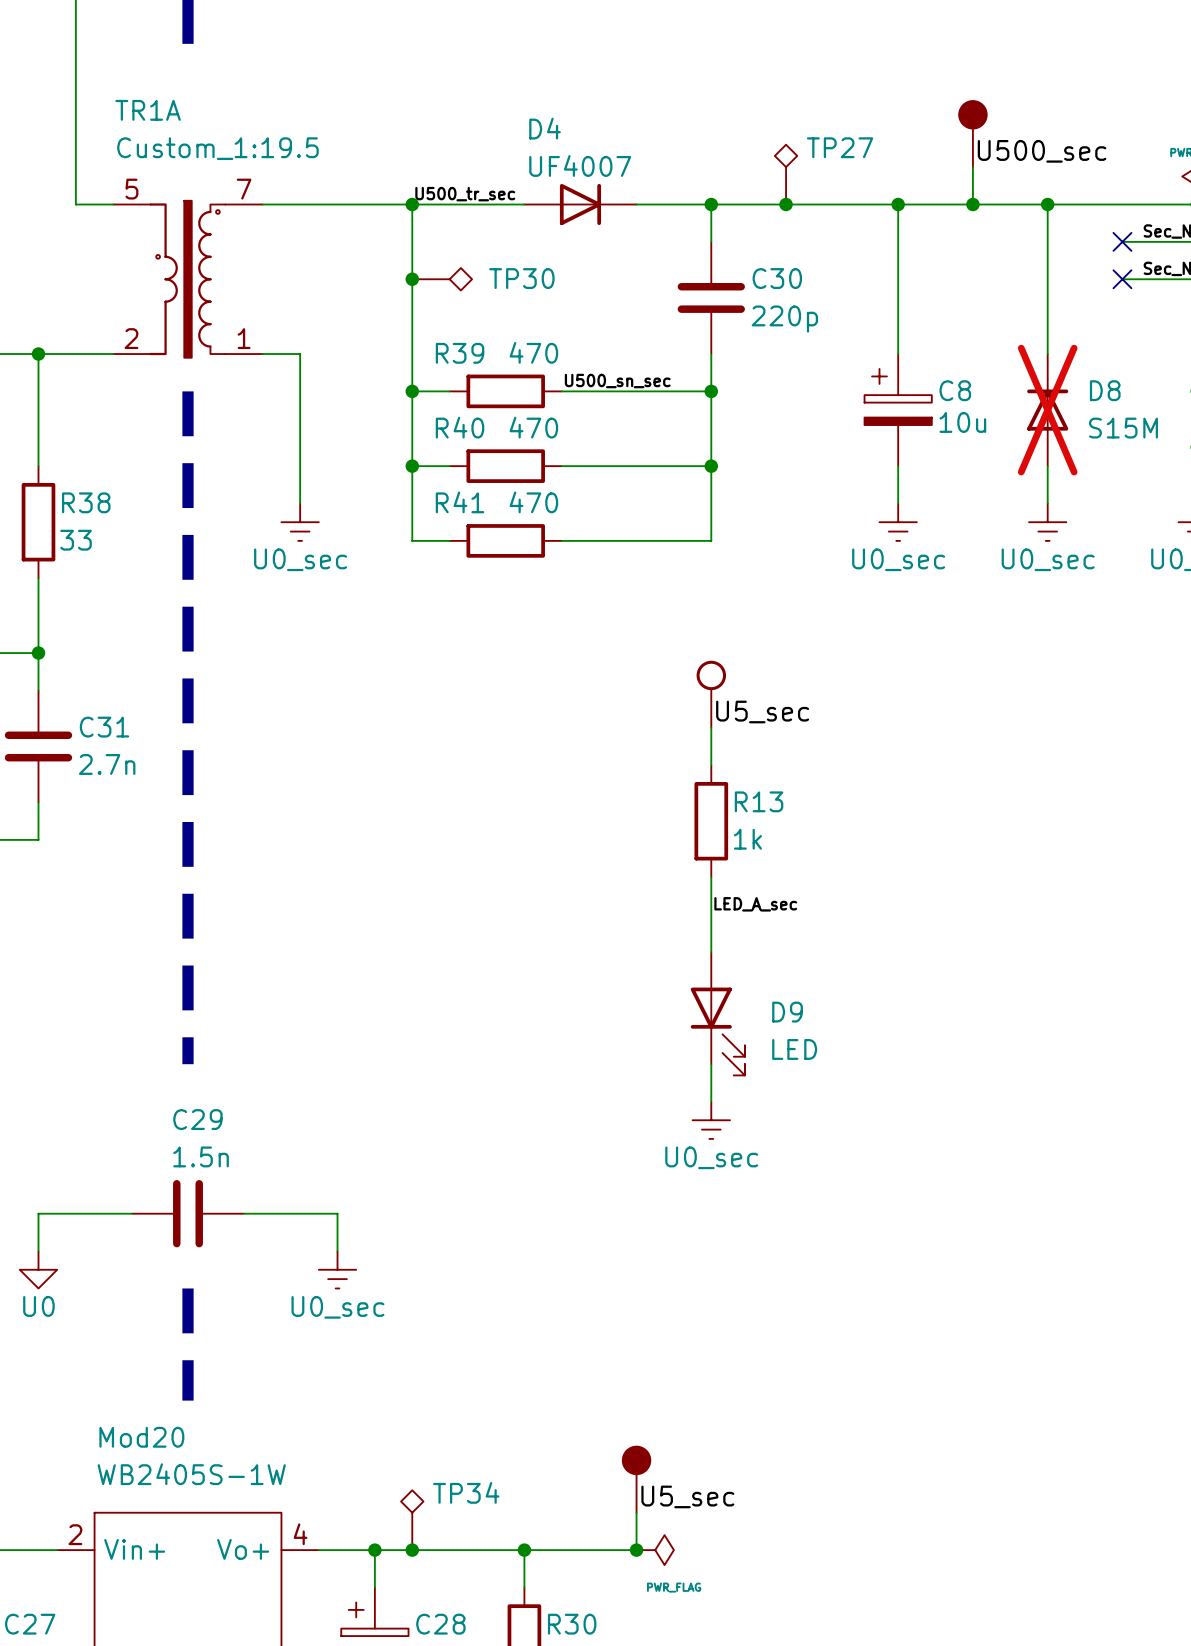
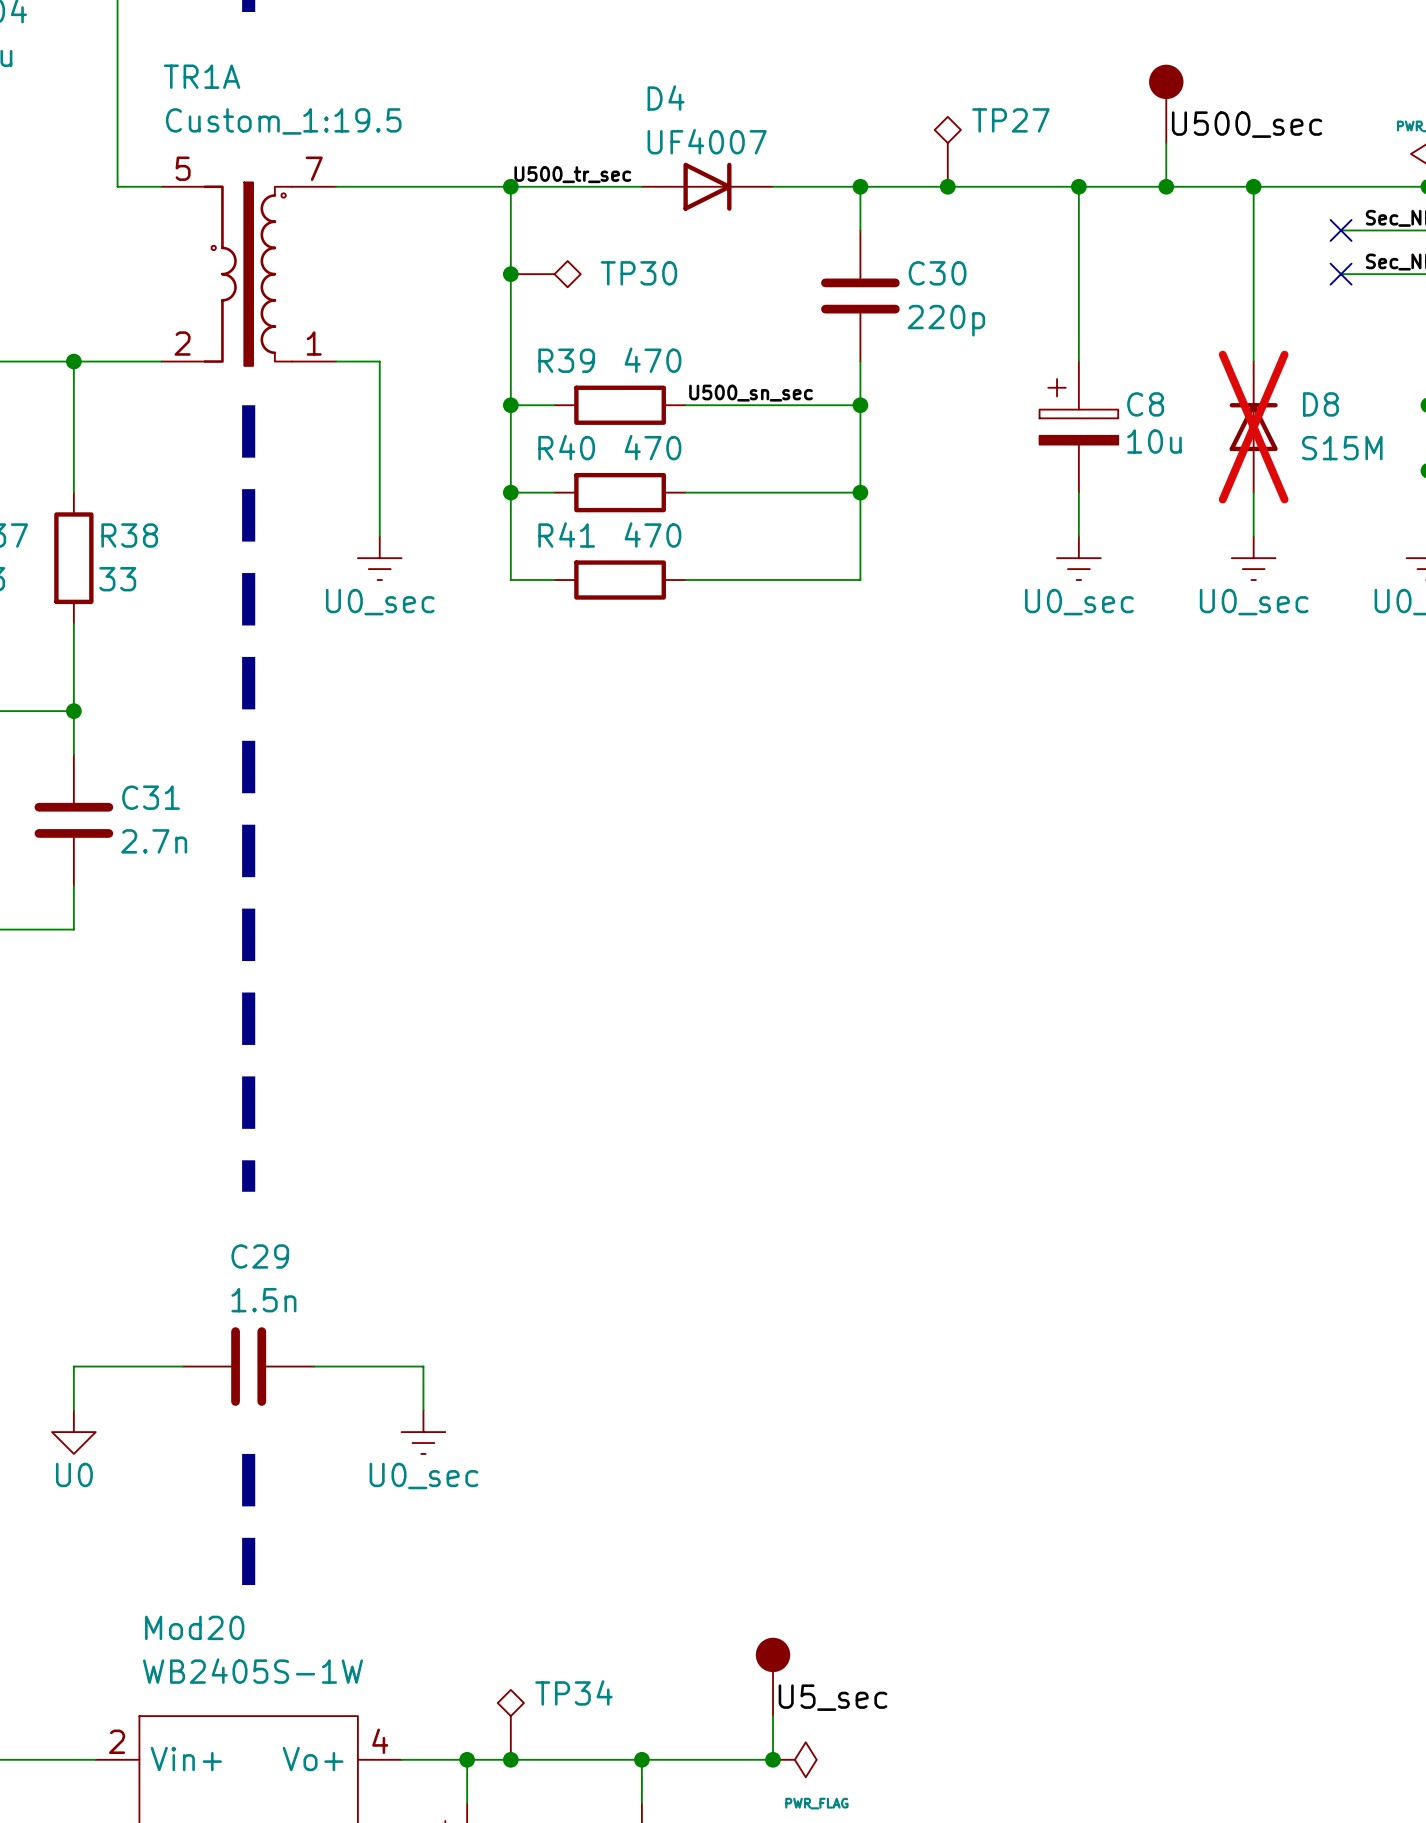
part: (711, 694) -> none
label: U5_sec (762, 712) -> none
wire: (711, 727) (711, 765) -> none
R13: 1k (711, 821) -> none
wire: (711, 877) (711, 952) -> none
label: LED_A_sec (755, 904) -> none
D9: LED (717, 1013) -> none
wire: (711, 1064) (711, 1101) -> none
power symbol: U0_sec (711, 1120) -> none

